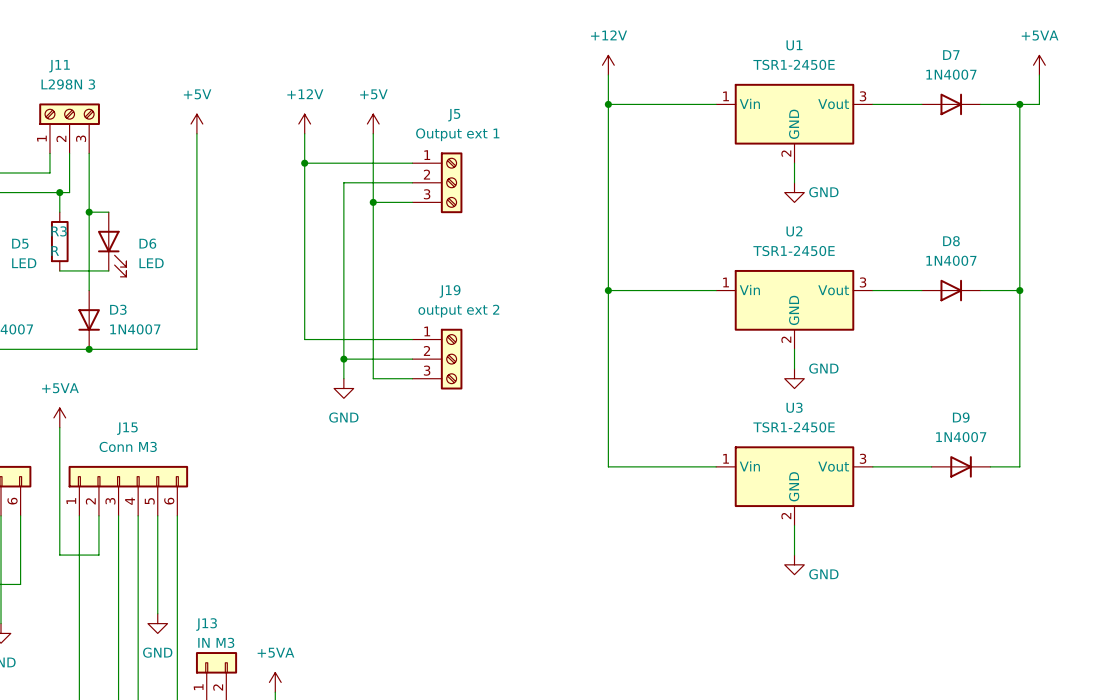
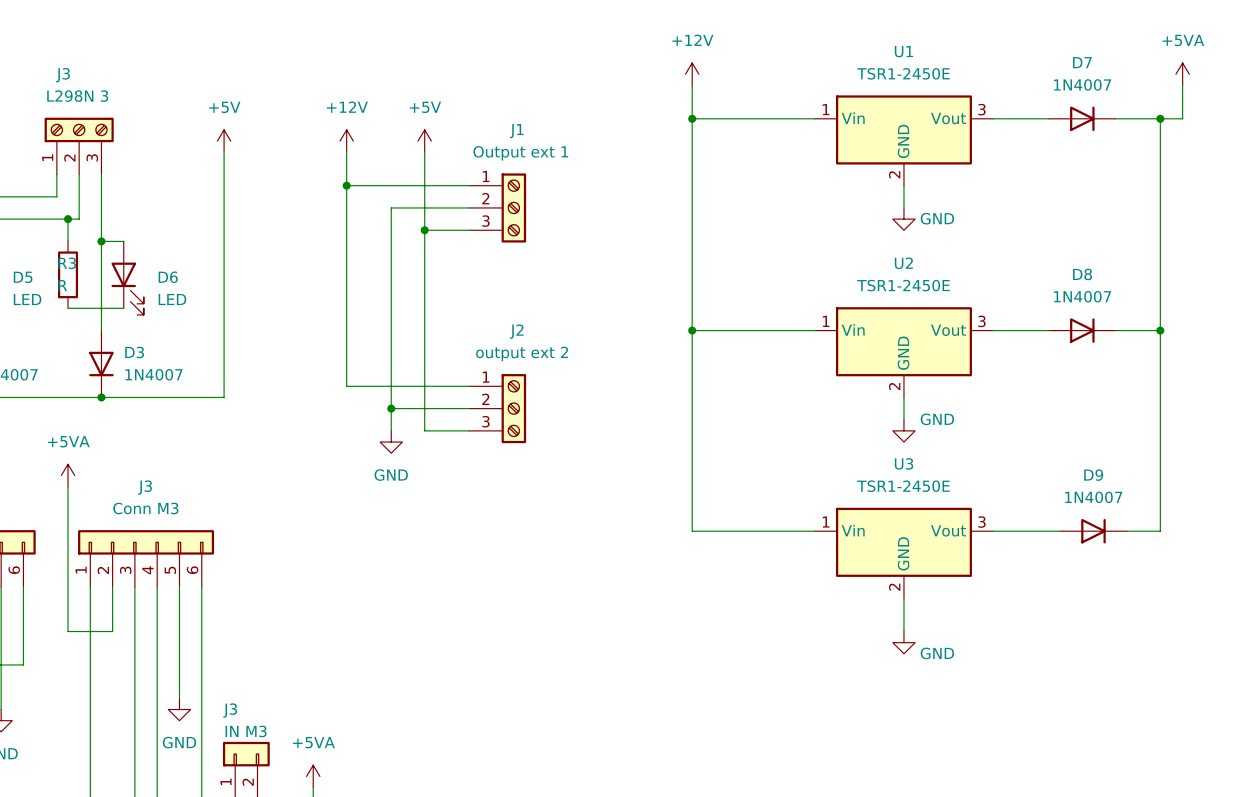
J11 name: J11 (59, 66) -> J3 (62, 75)
J5 name: J5 (454, 115) -> J1 (516, 131)
J19 name: J19 (450, 291) -> J2 (516, 331)
J15 name: J15 (127, 428) -> J3 (145, 487)
J13 name: J13 (206, 624) -> J3 (230, 710)

